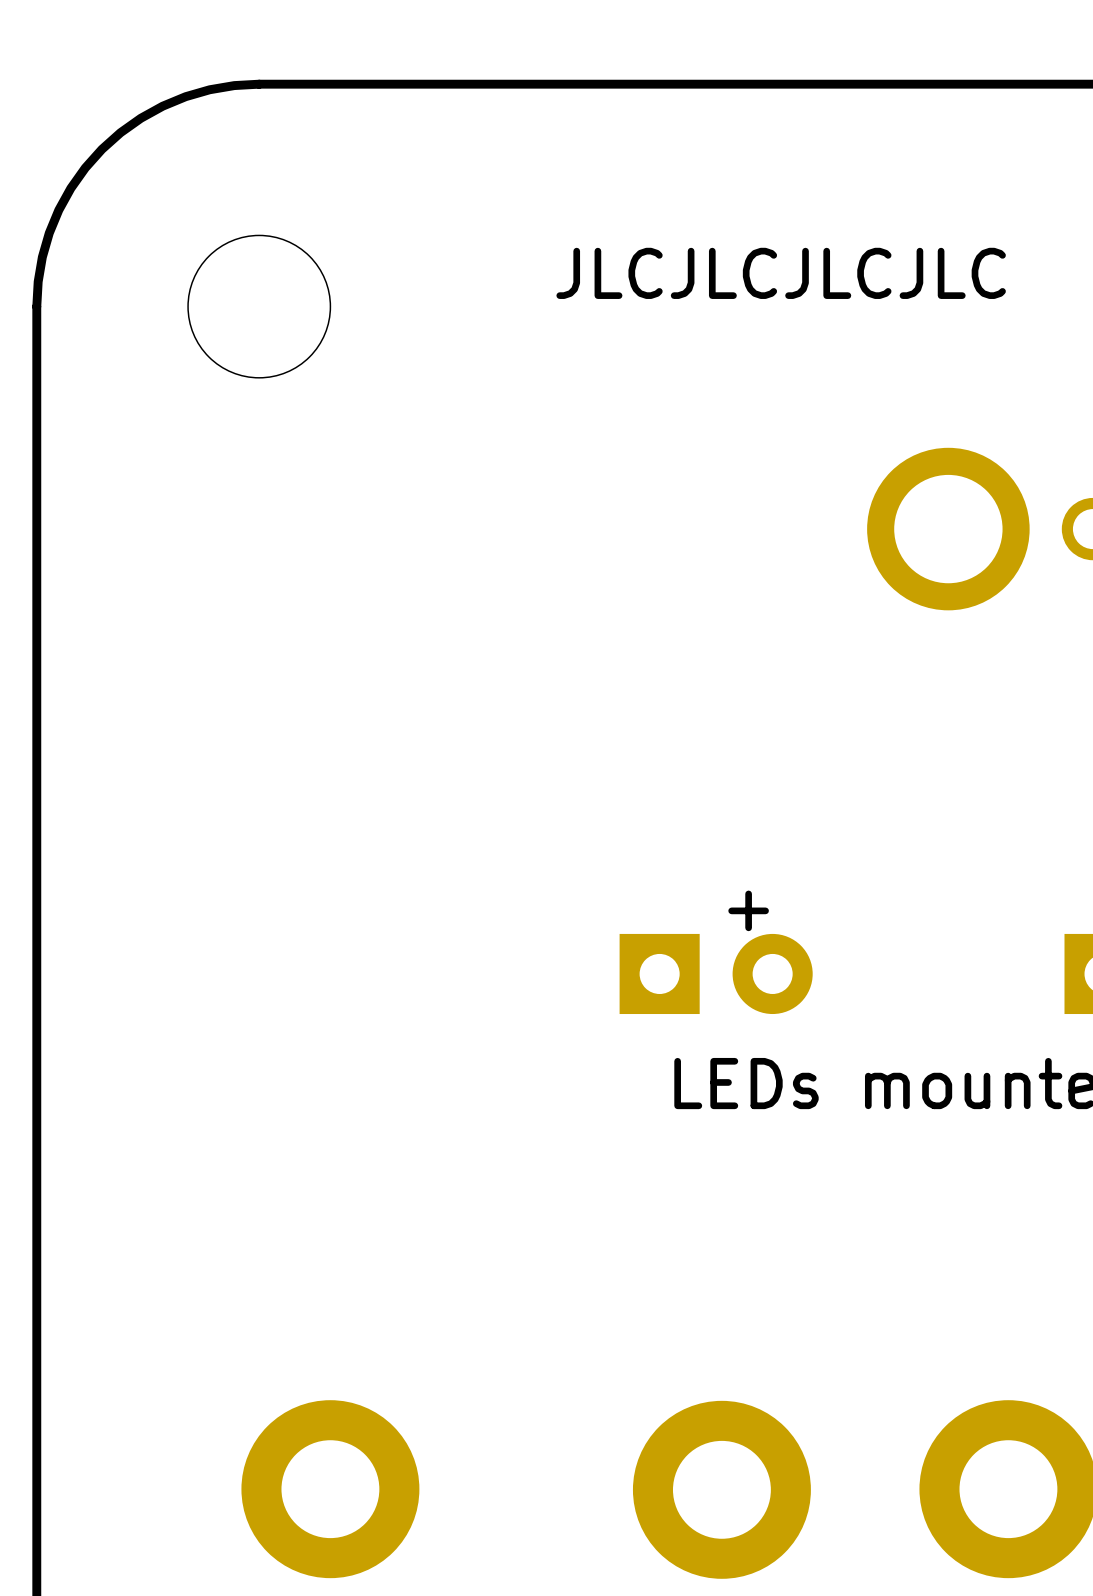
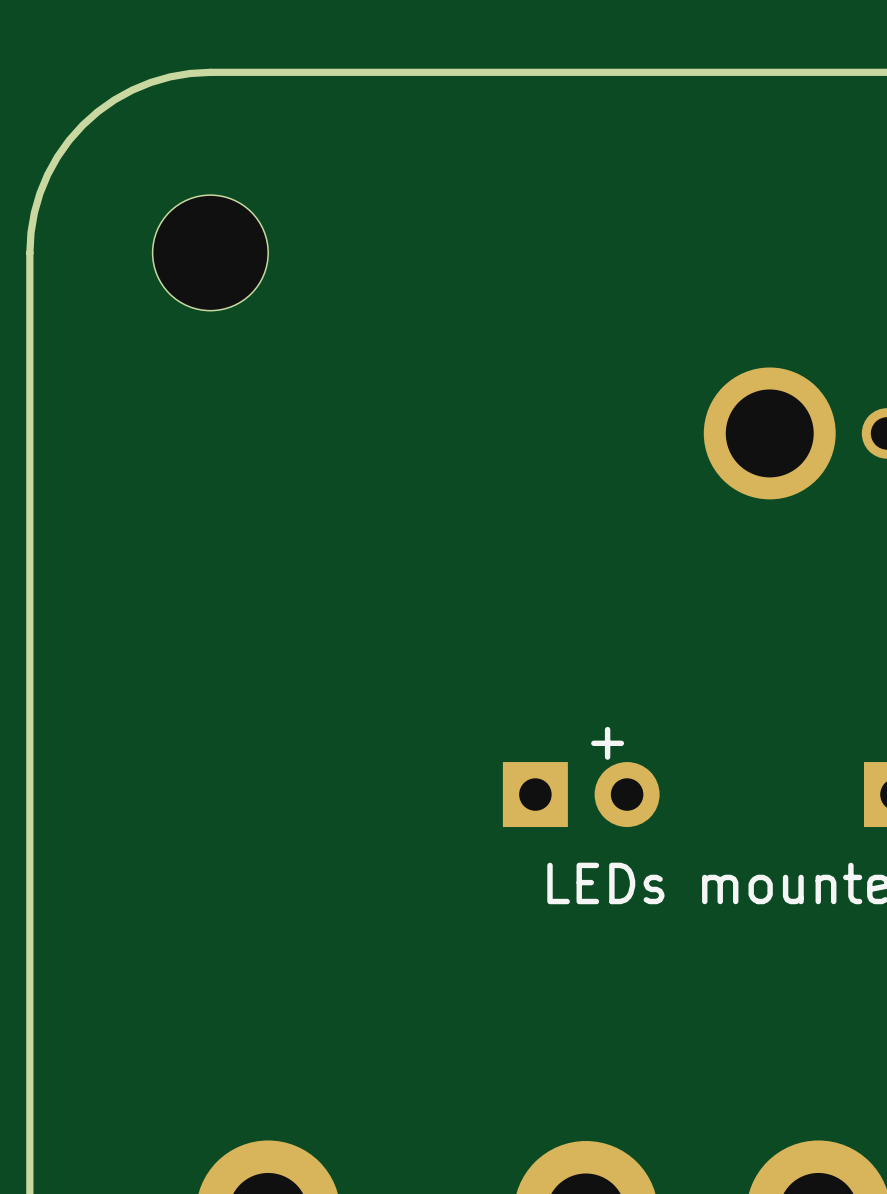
text: JLCJLCJLCJLC (781, 273) -> none

